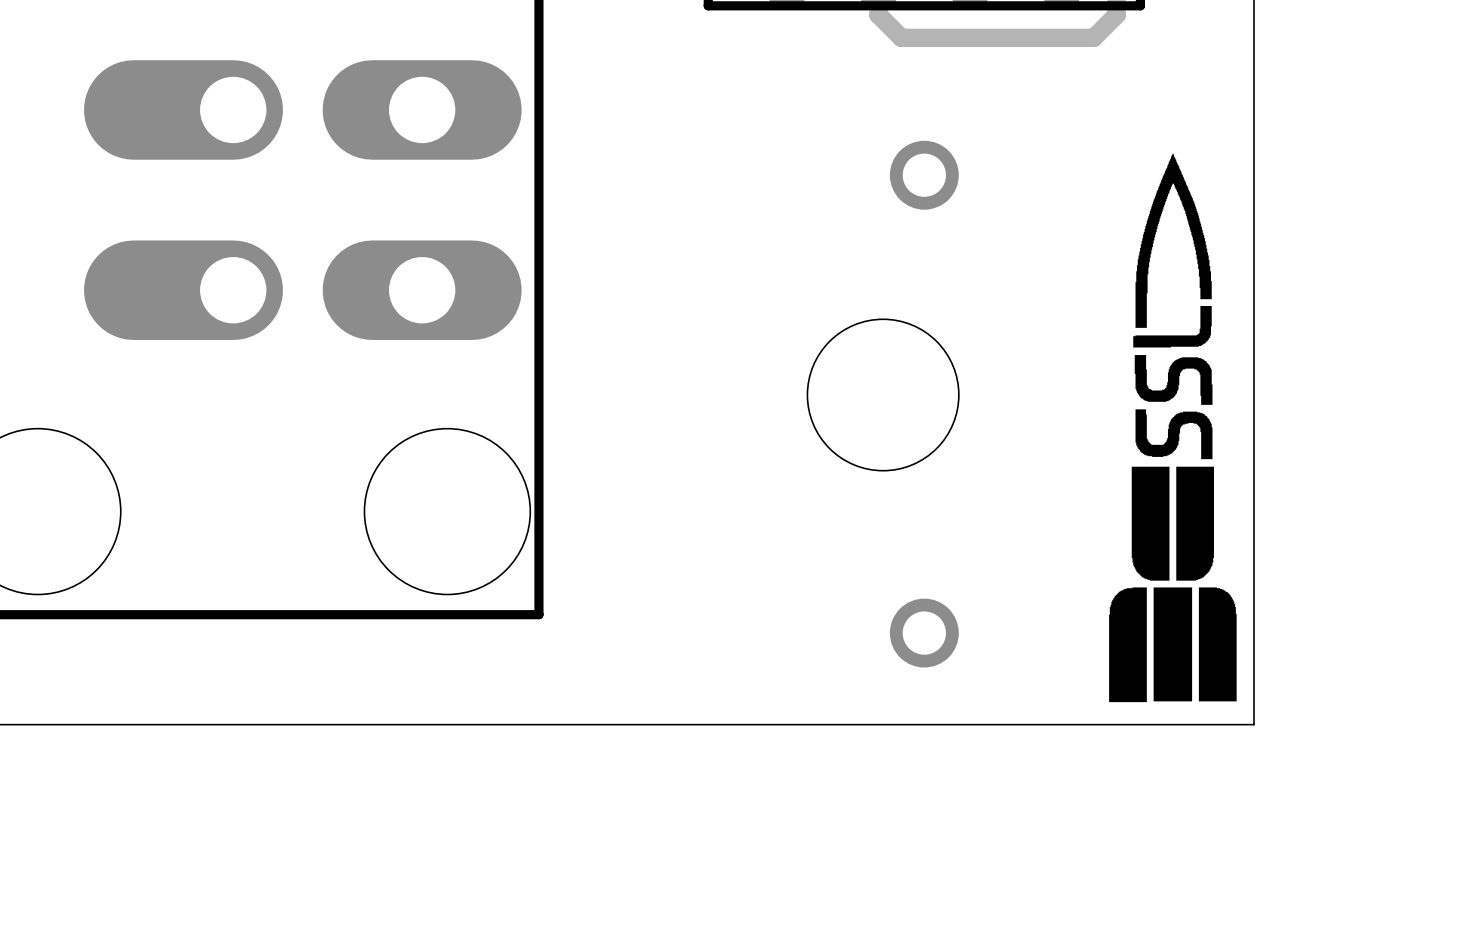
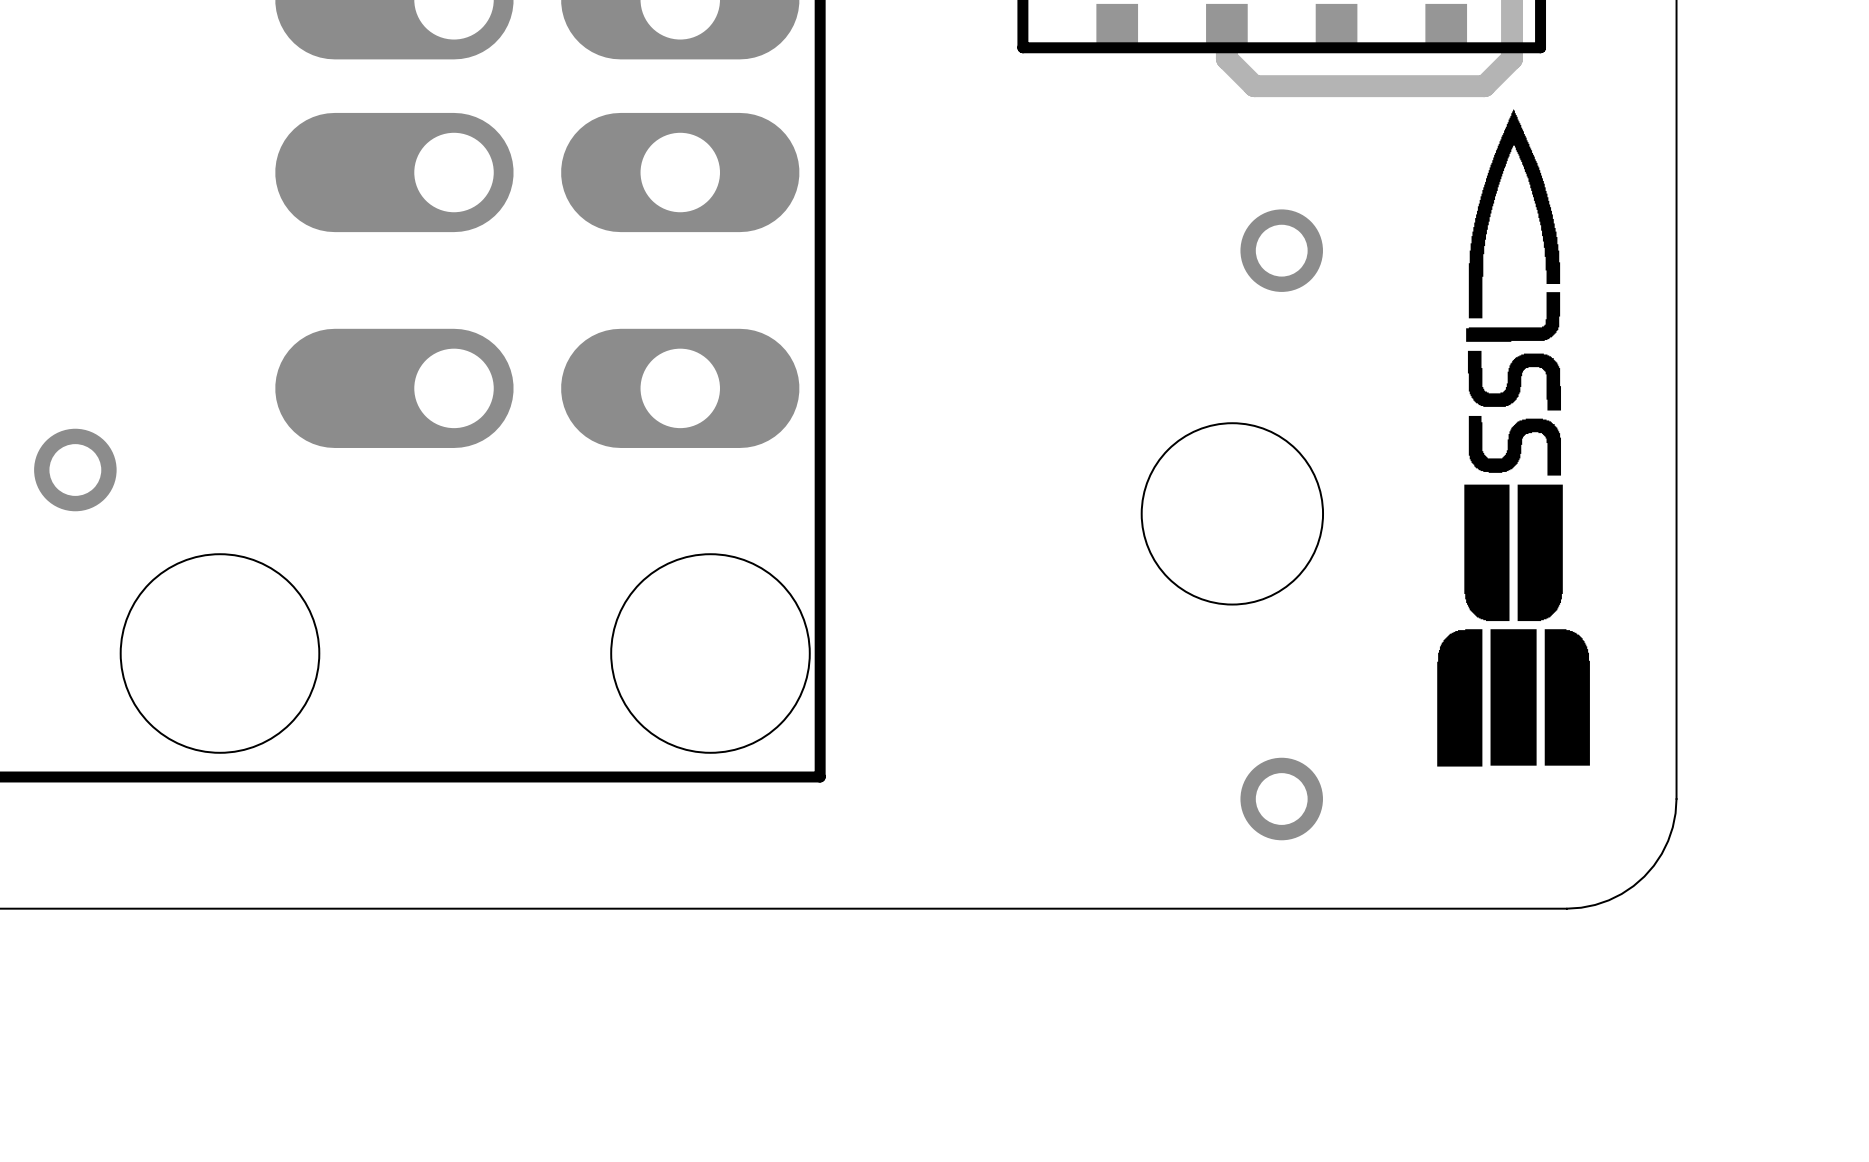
drawing position: (1172, 427) -> (1513, 438)
board edge: (1253, 633) (1253, 724) (1162, 724) -> (1676, 799) (1672, 827) (1668, 840) (1661, 853) (1644, 876) (1621, 893) (1608, 900) (1595, 904) (1566, 908)

